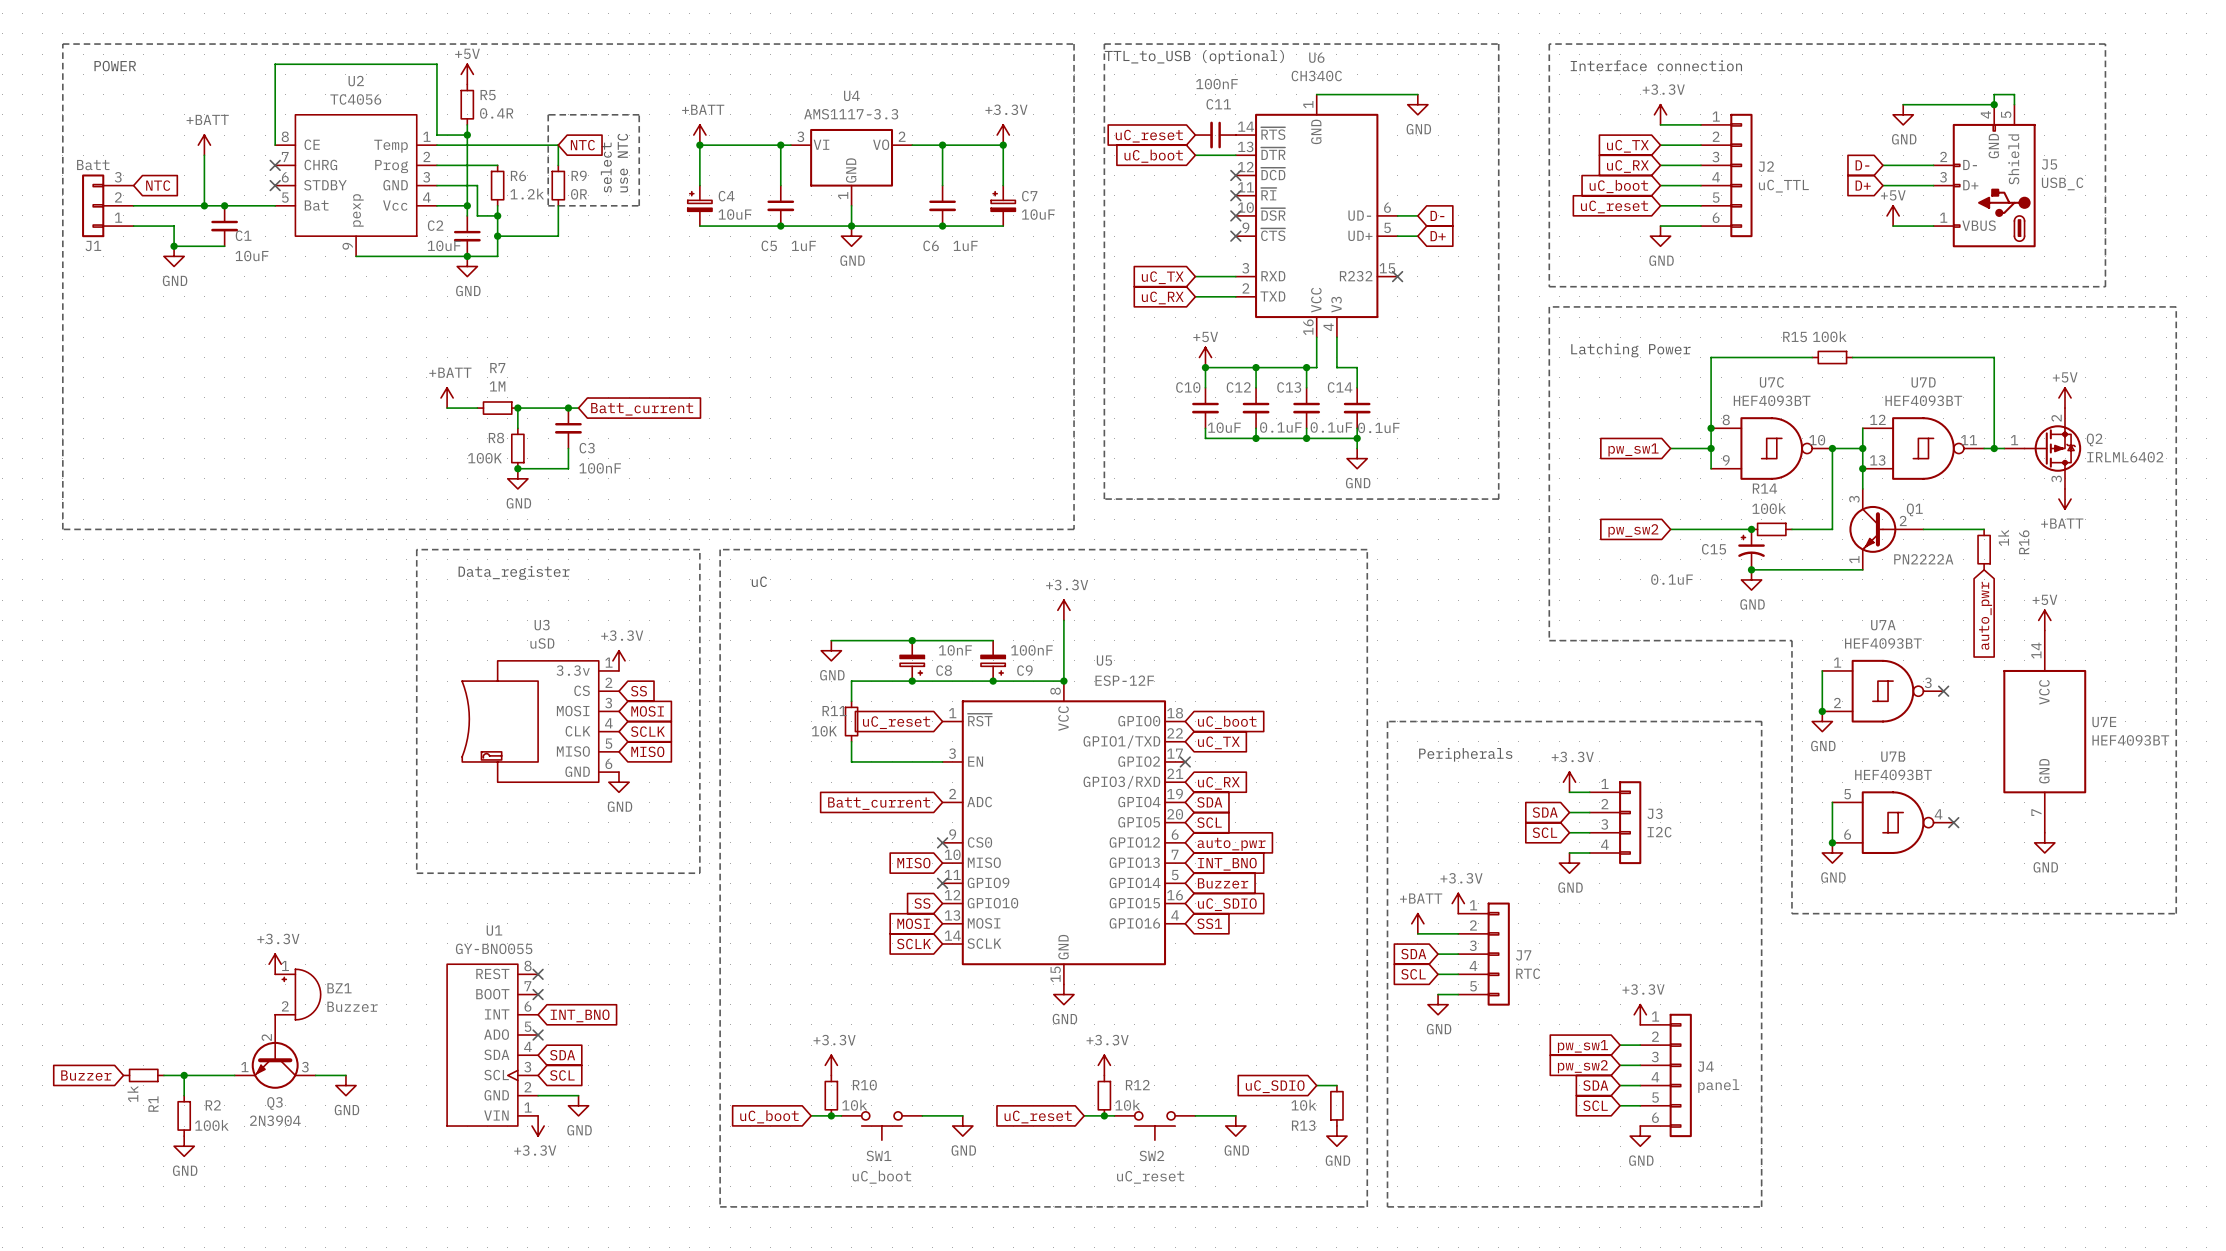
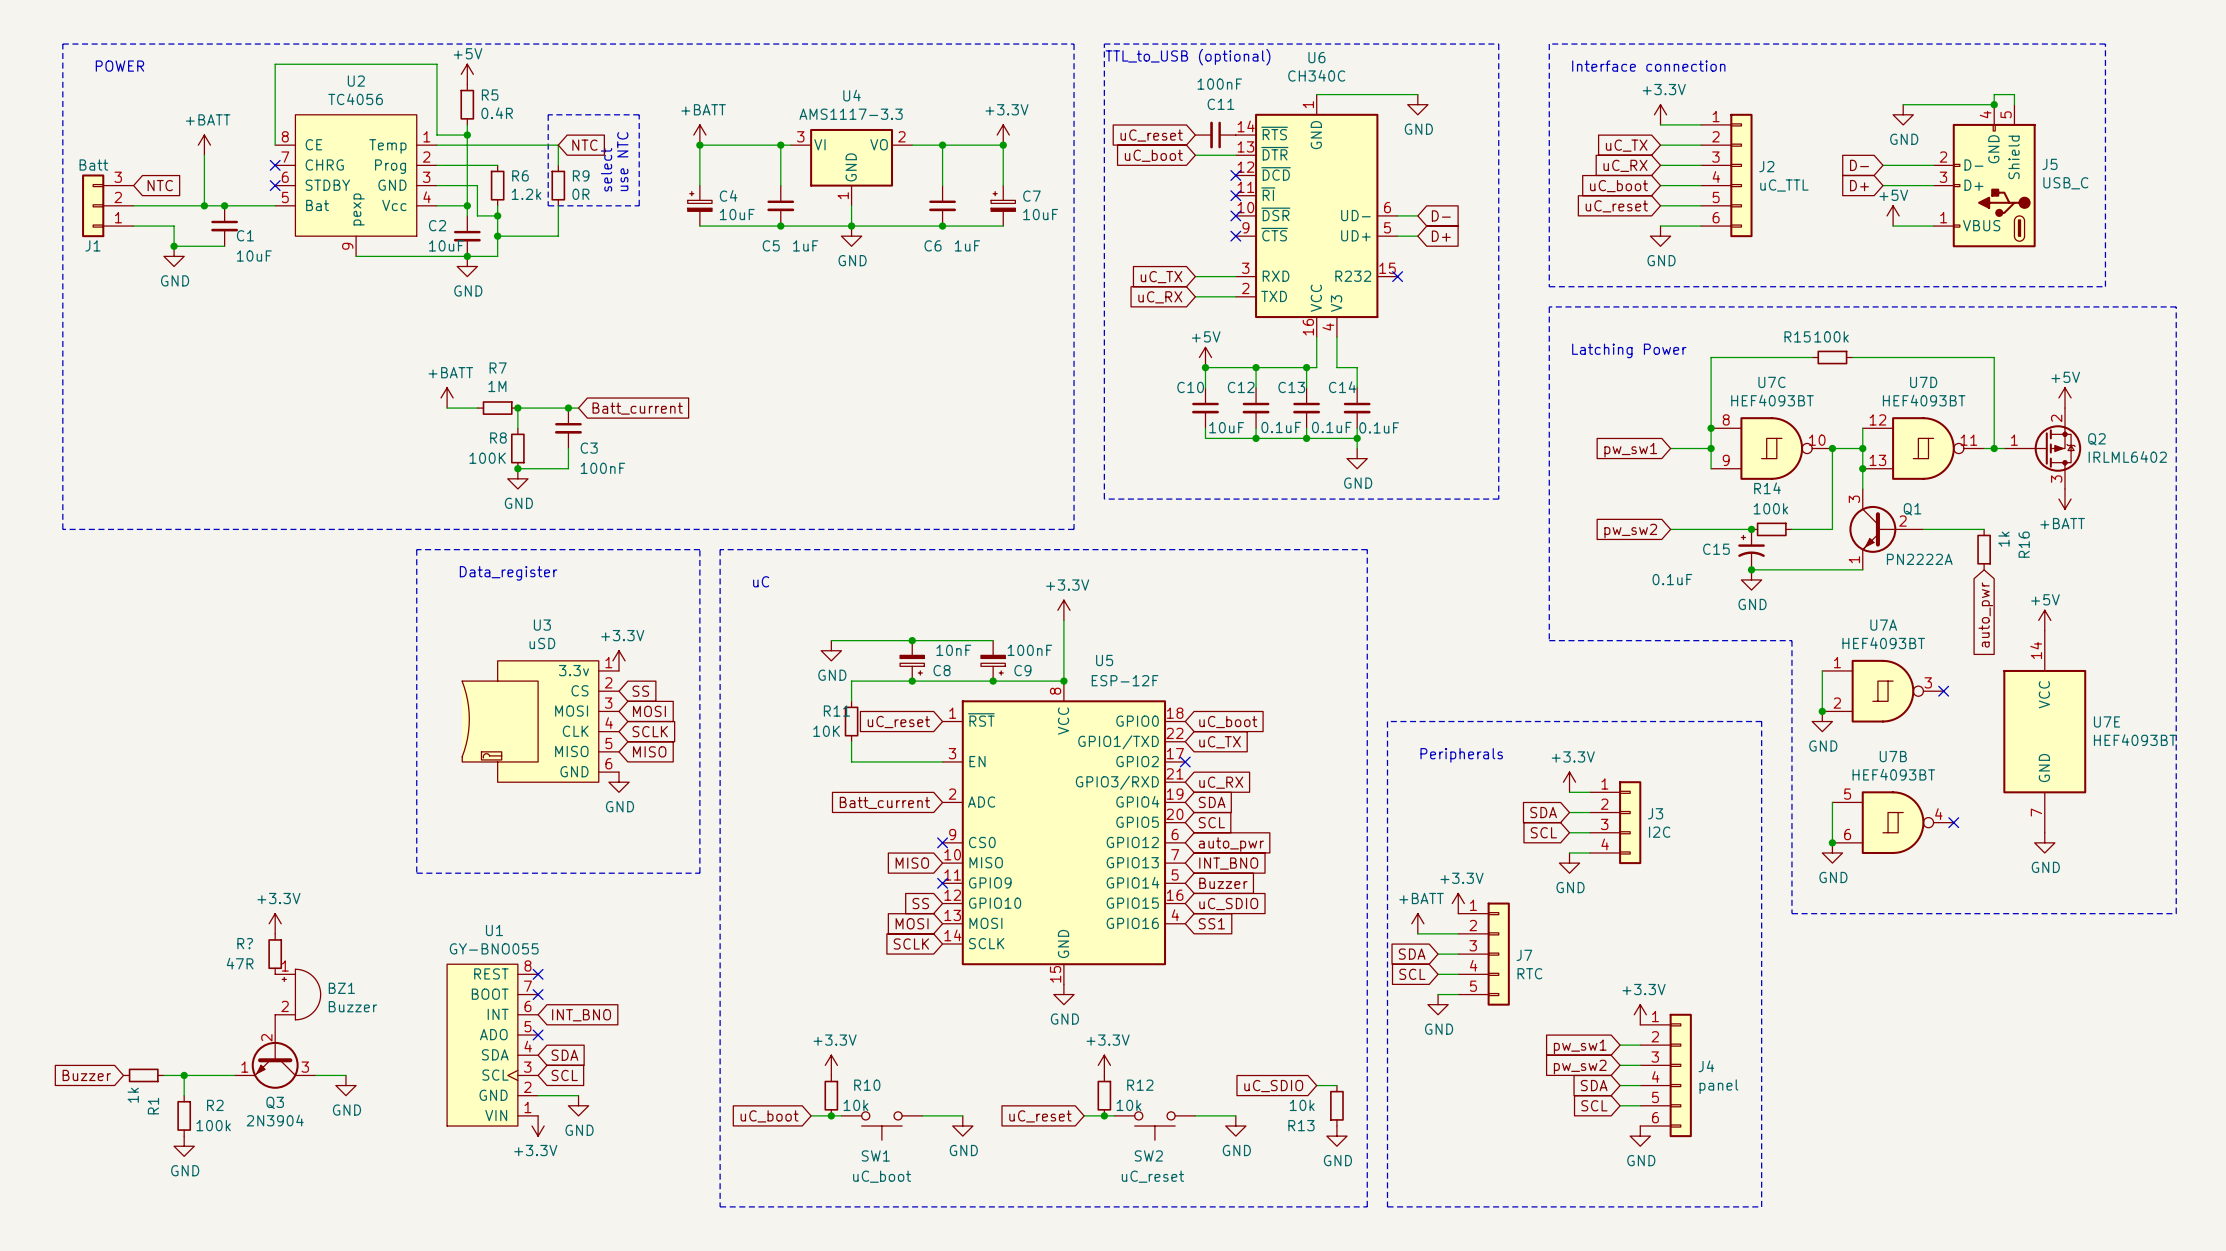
R?: none -> 47R (275, 954)
power symbol position: +3.3V (275, 964) -> +3.3V (275, 923)

